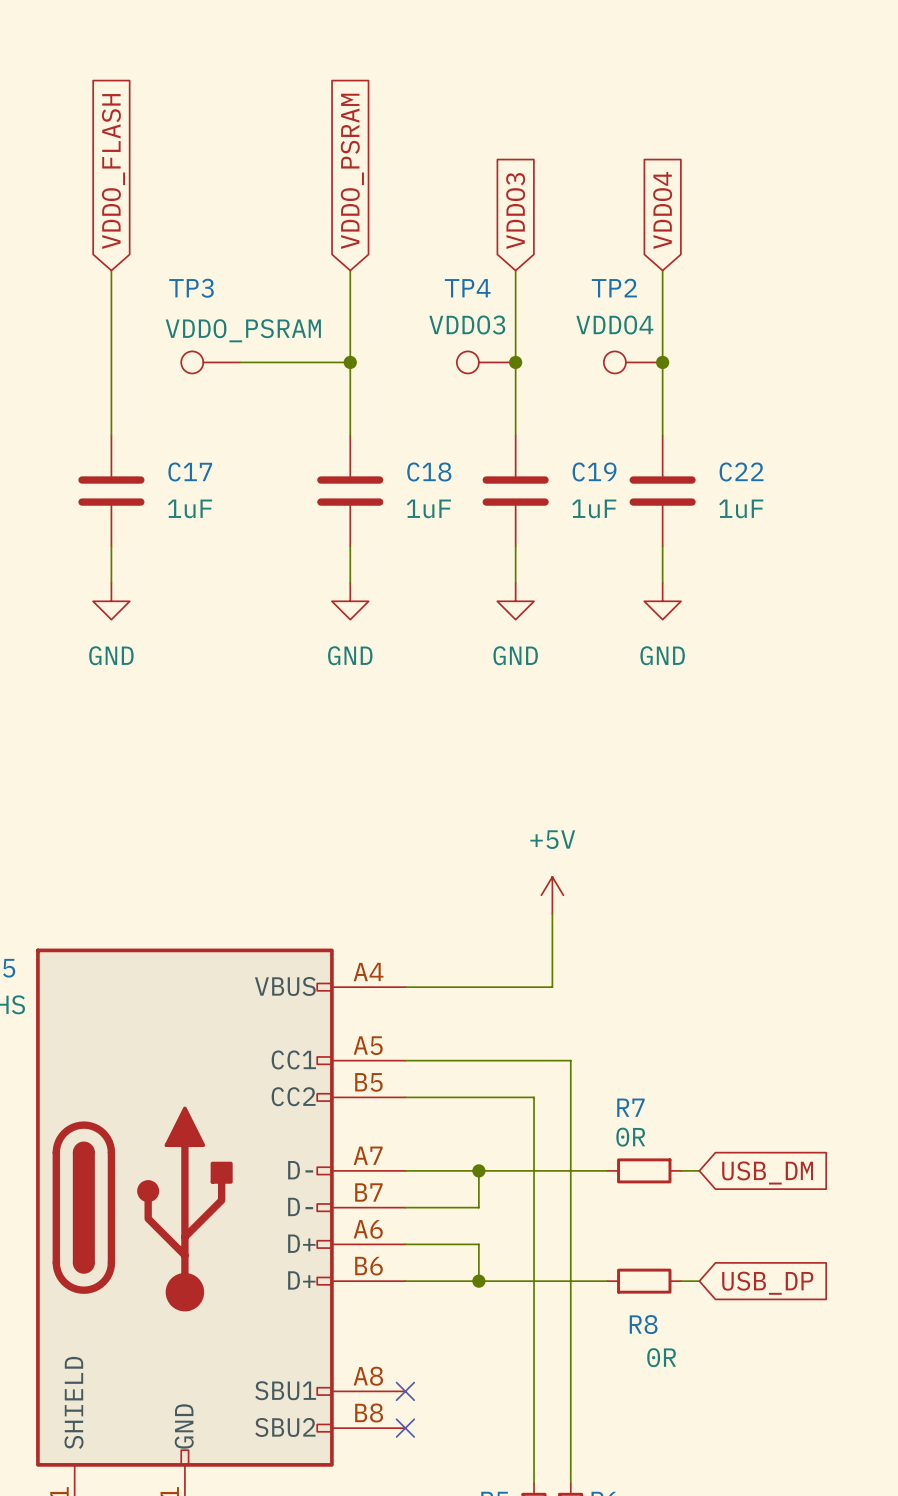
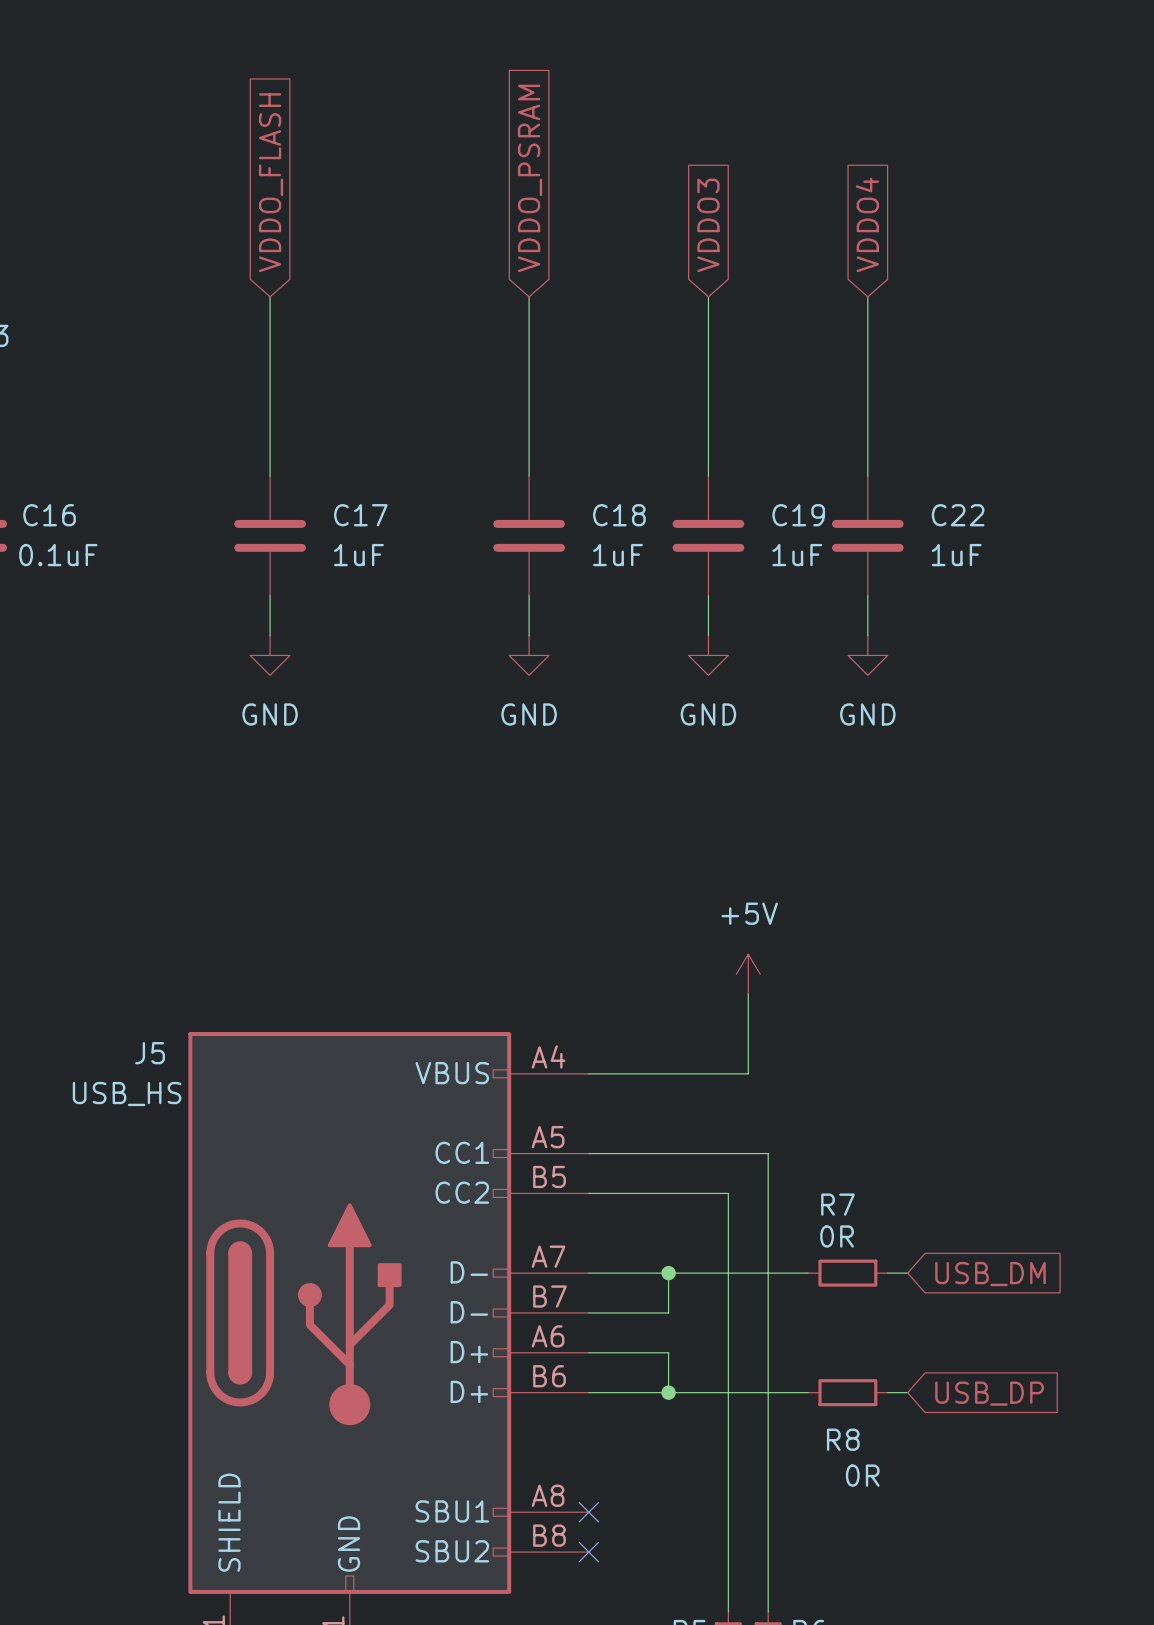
TP3: VDDO_PSRAM (210, 362) -> none
wire: (240, 362) (350, 362) -> none
junction: (350, 362) -> none
TP4: VDDO3 (486, 362) -> none
junction: (515, 362) -> none
TP2: VDDO4 (633, 362) -> none
junction: (662, 362) -> none

